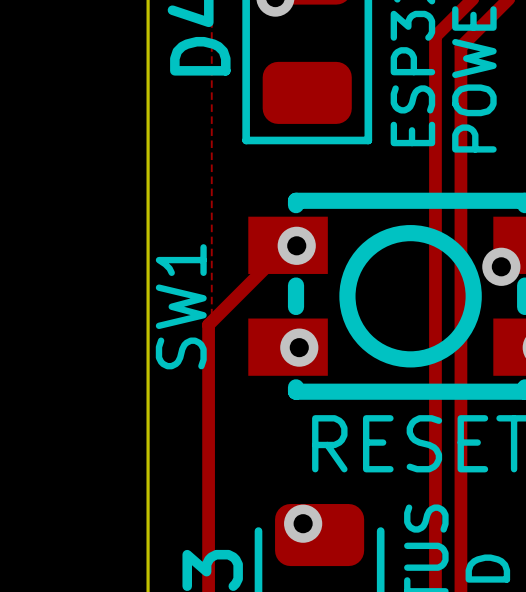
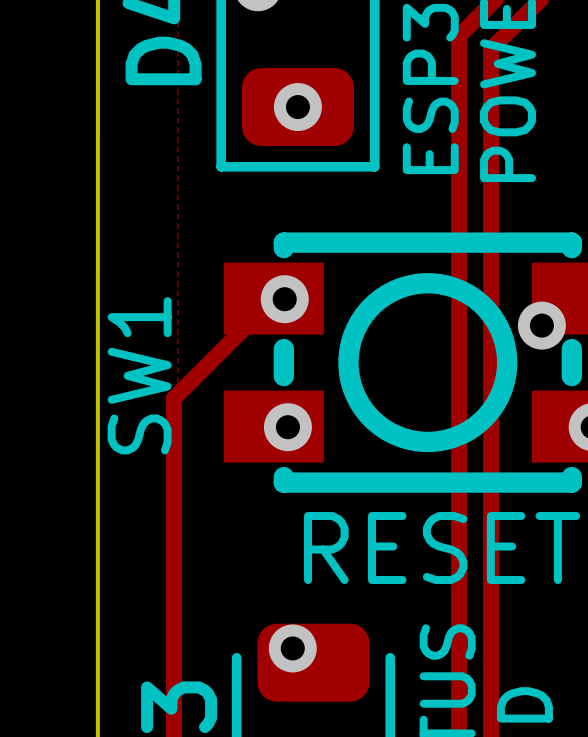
via: none -> (297, 107)

